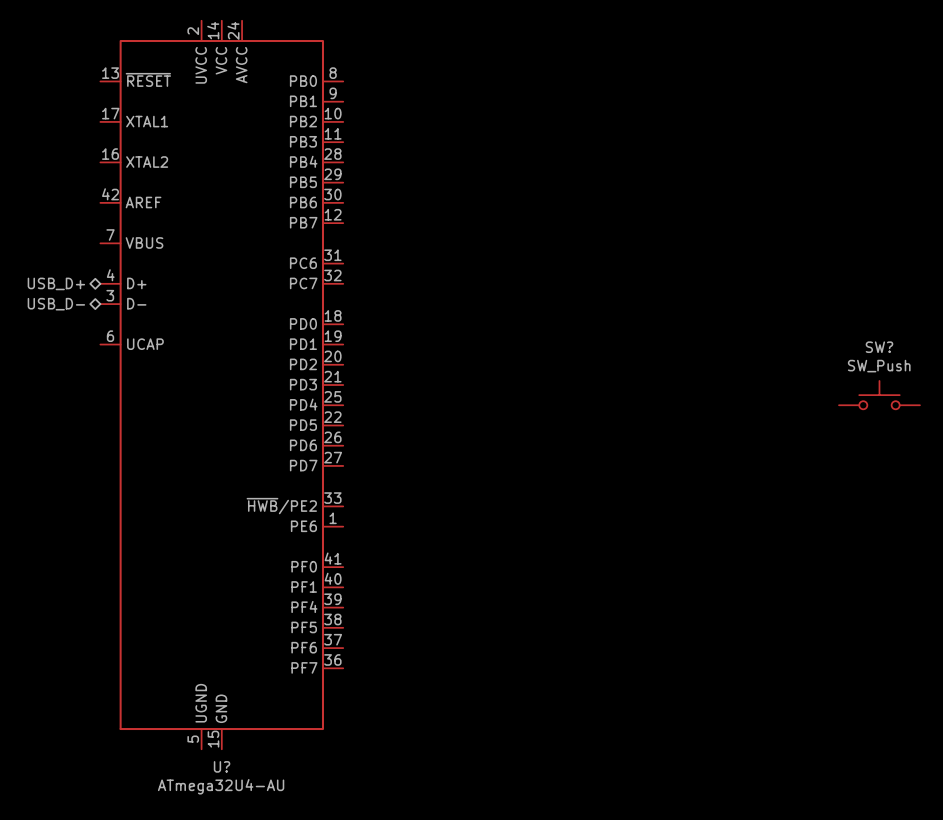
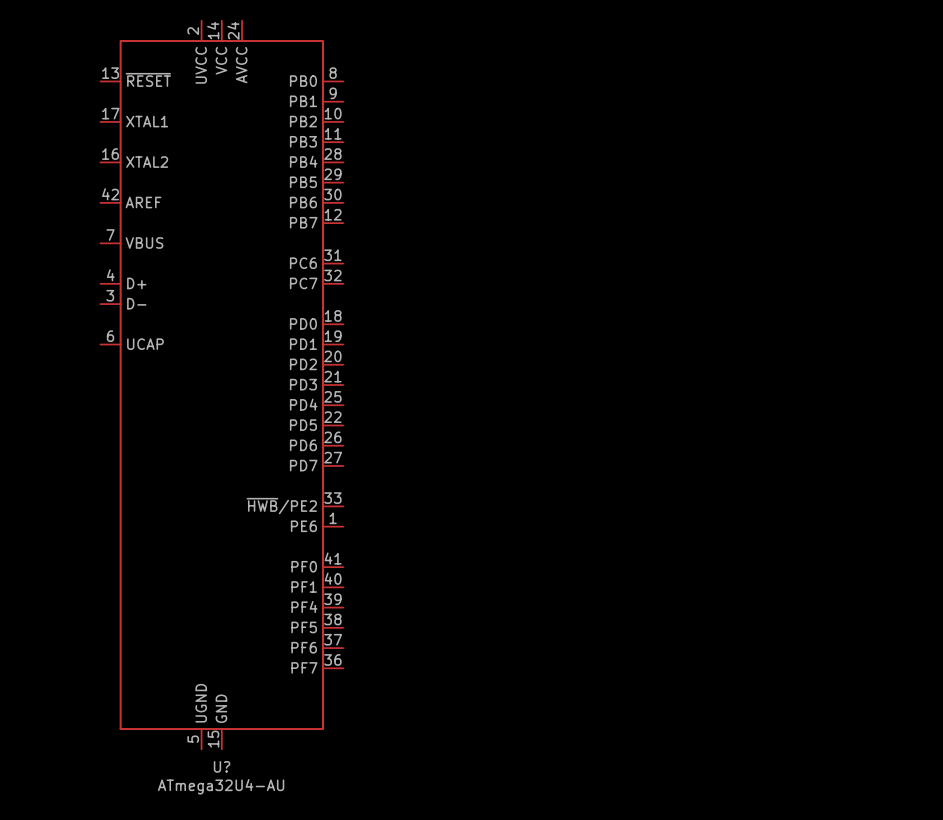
hierarchical label: USB_D+ (56, 283) -> none
hierarchical label: USB_D- (56, 304) -> none
SW?: SW_Push (879, 395) -> none

